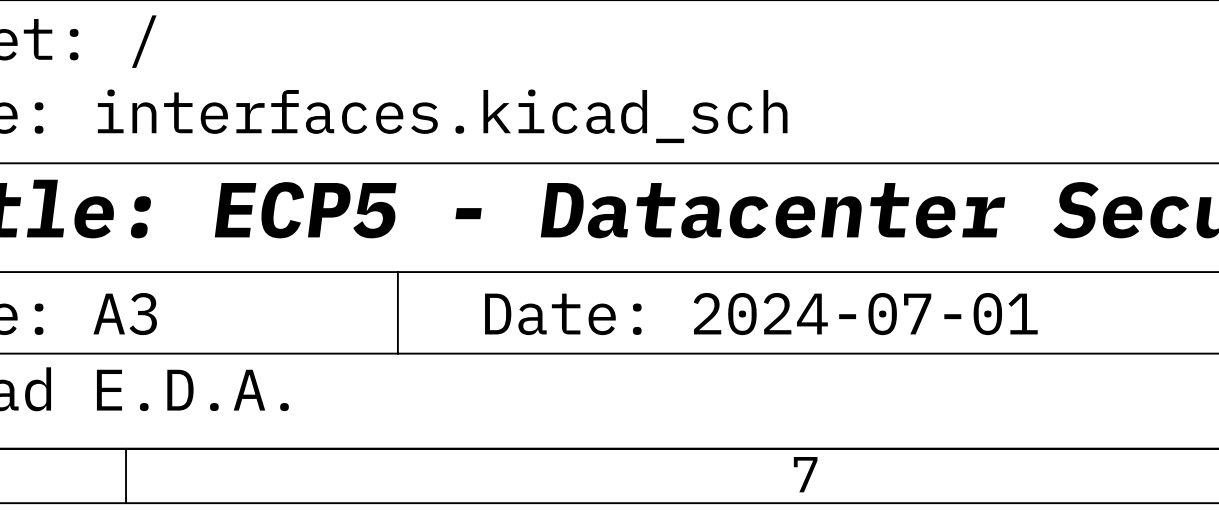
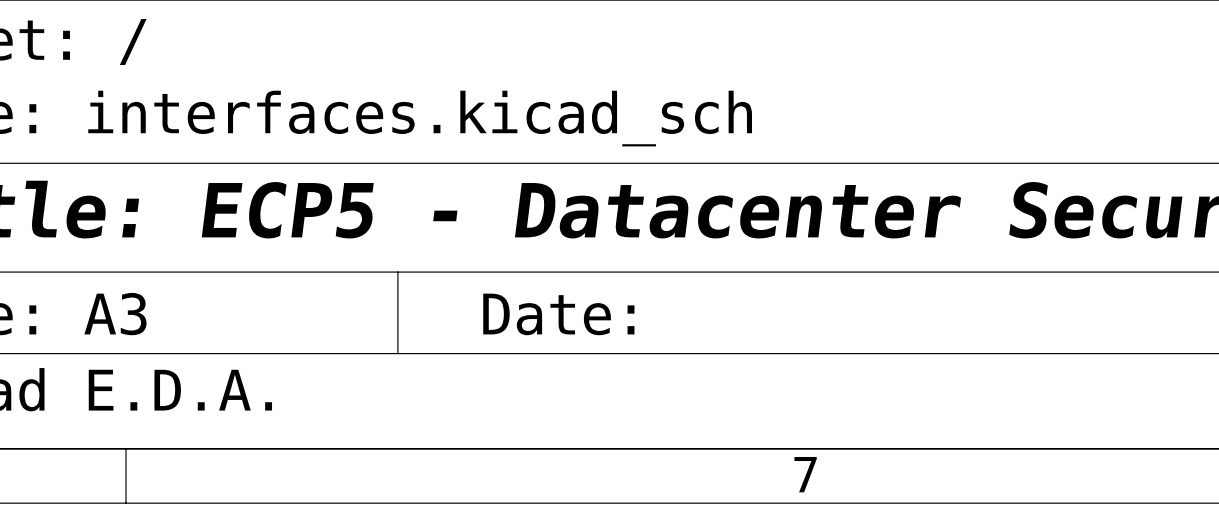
title block: Date: 2024-07-01 (761, 314) -> Date: (558, 314)

